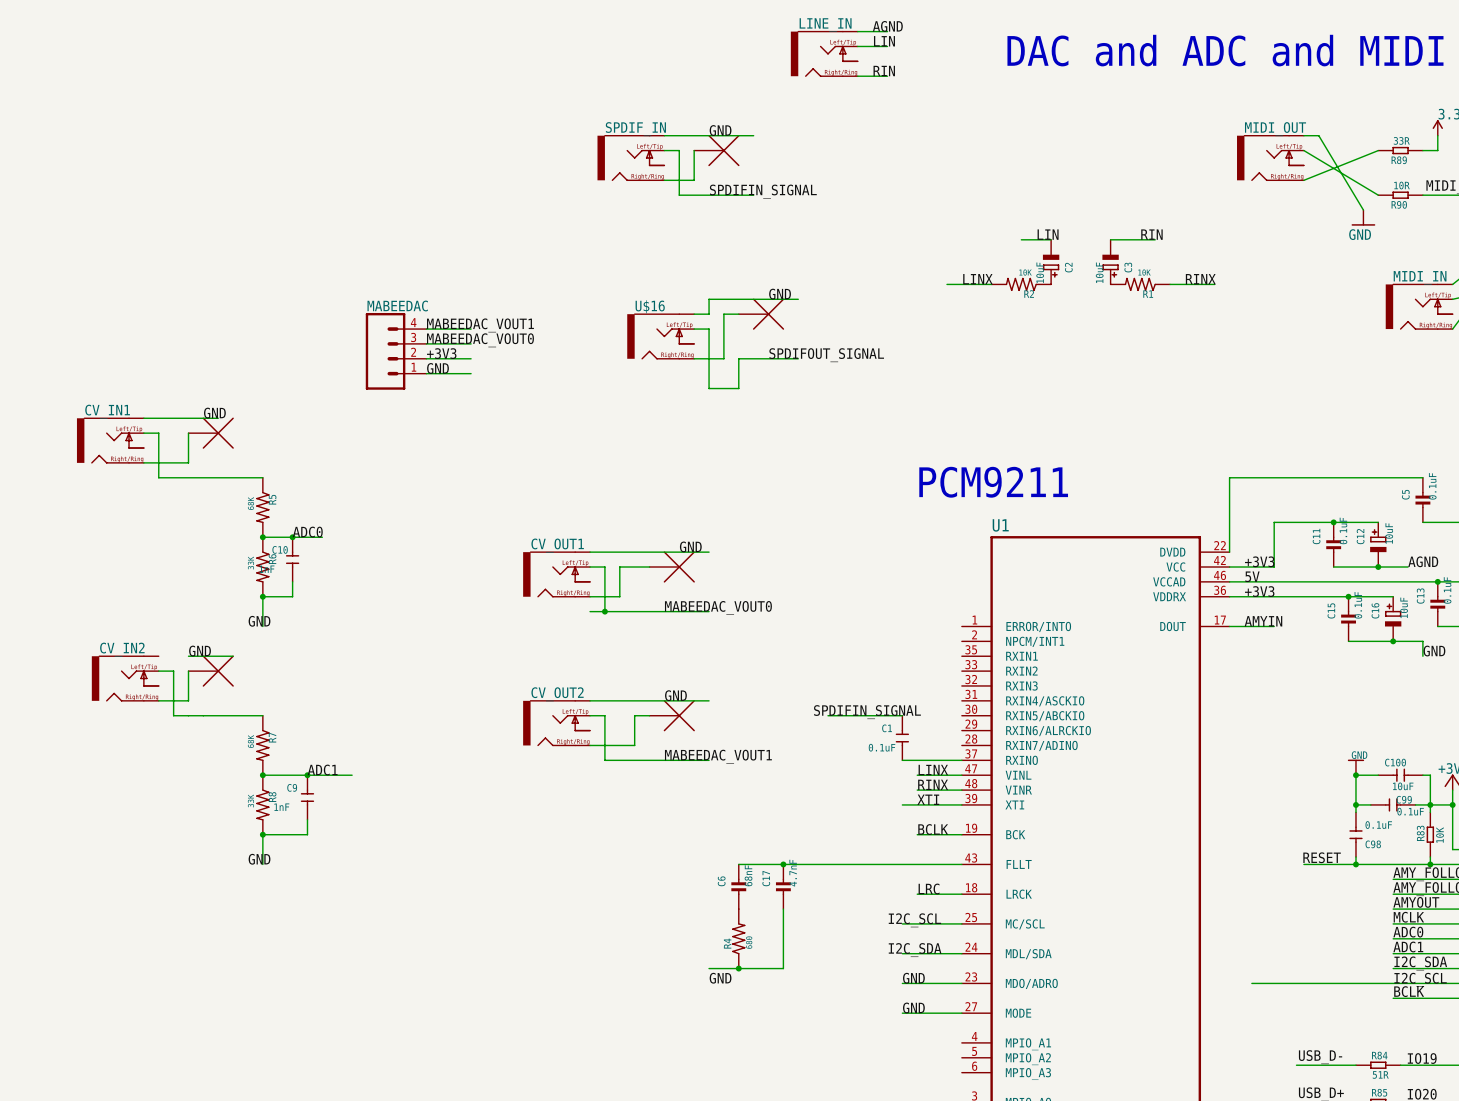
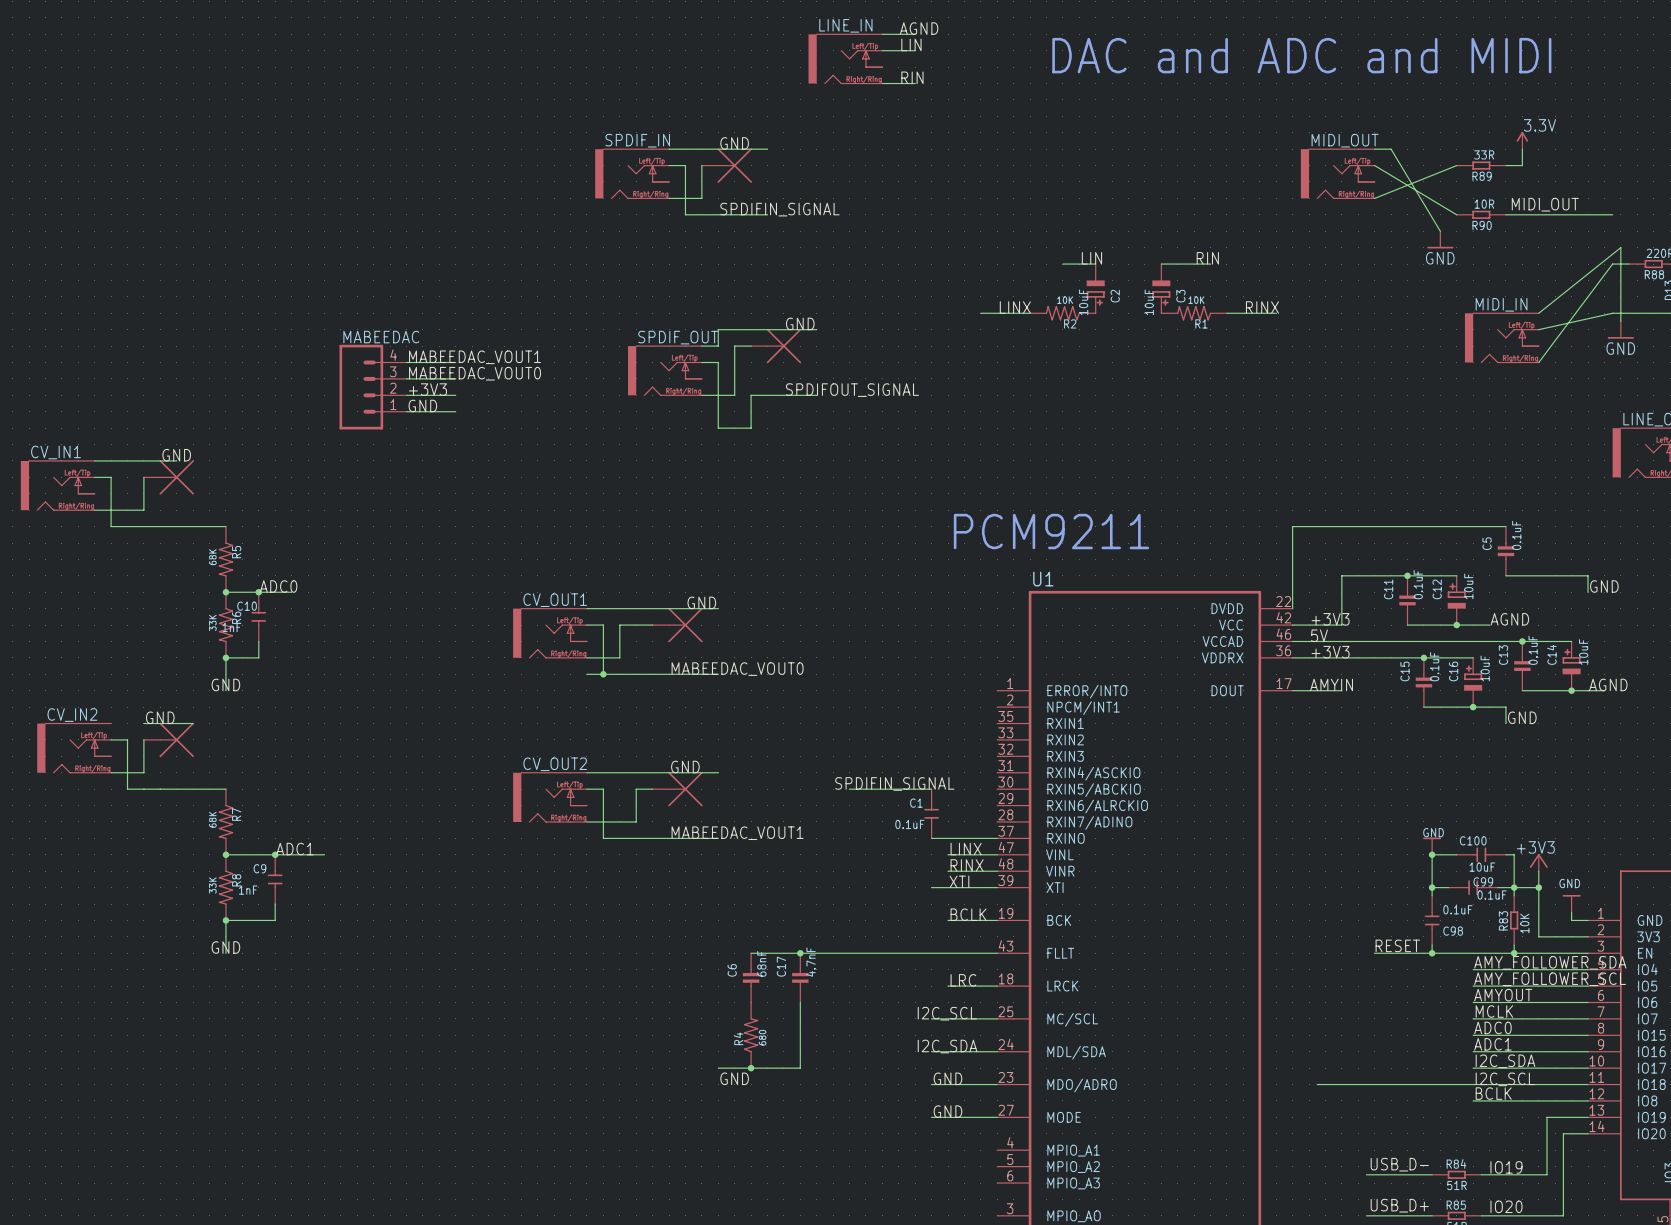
U$16 name: U$16 (650, 306) -> SPDIF_OUT (678, 337)

